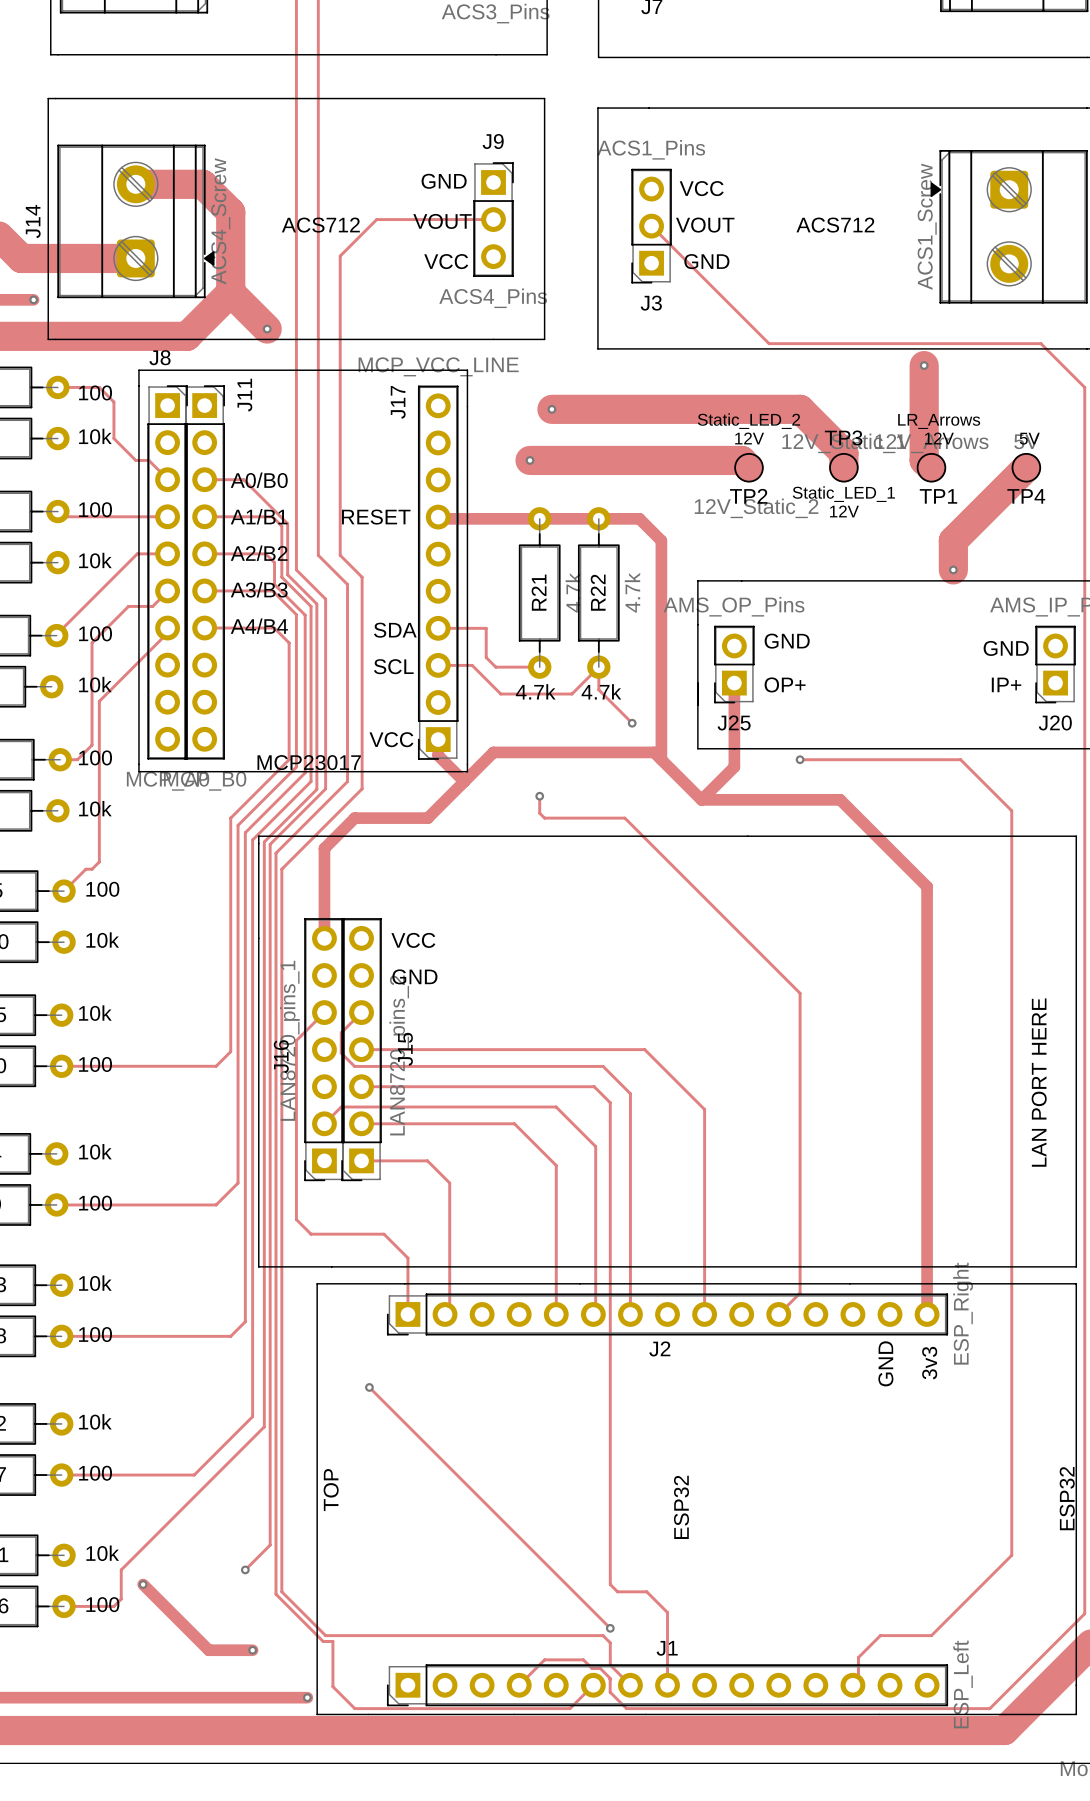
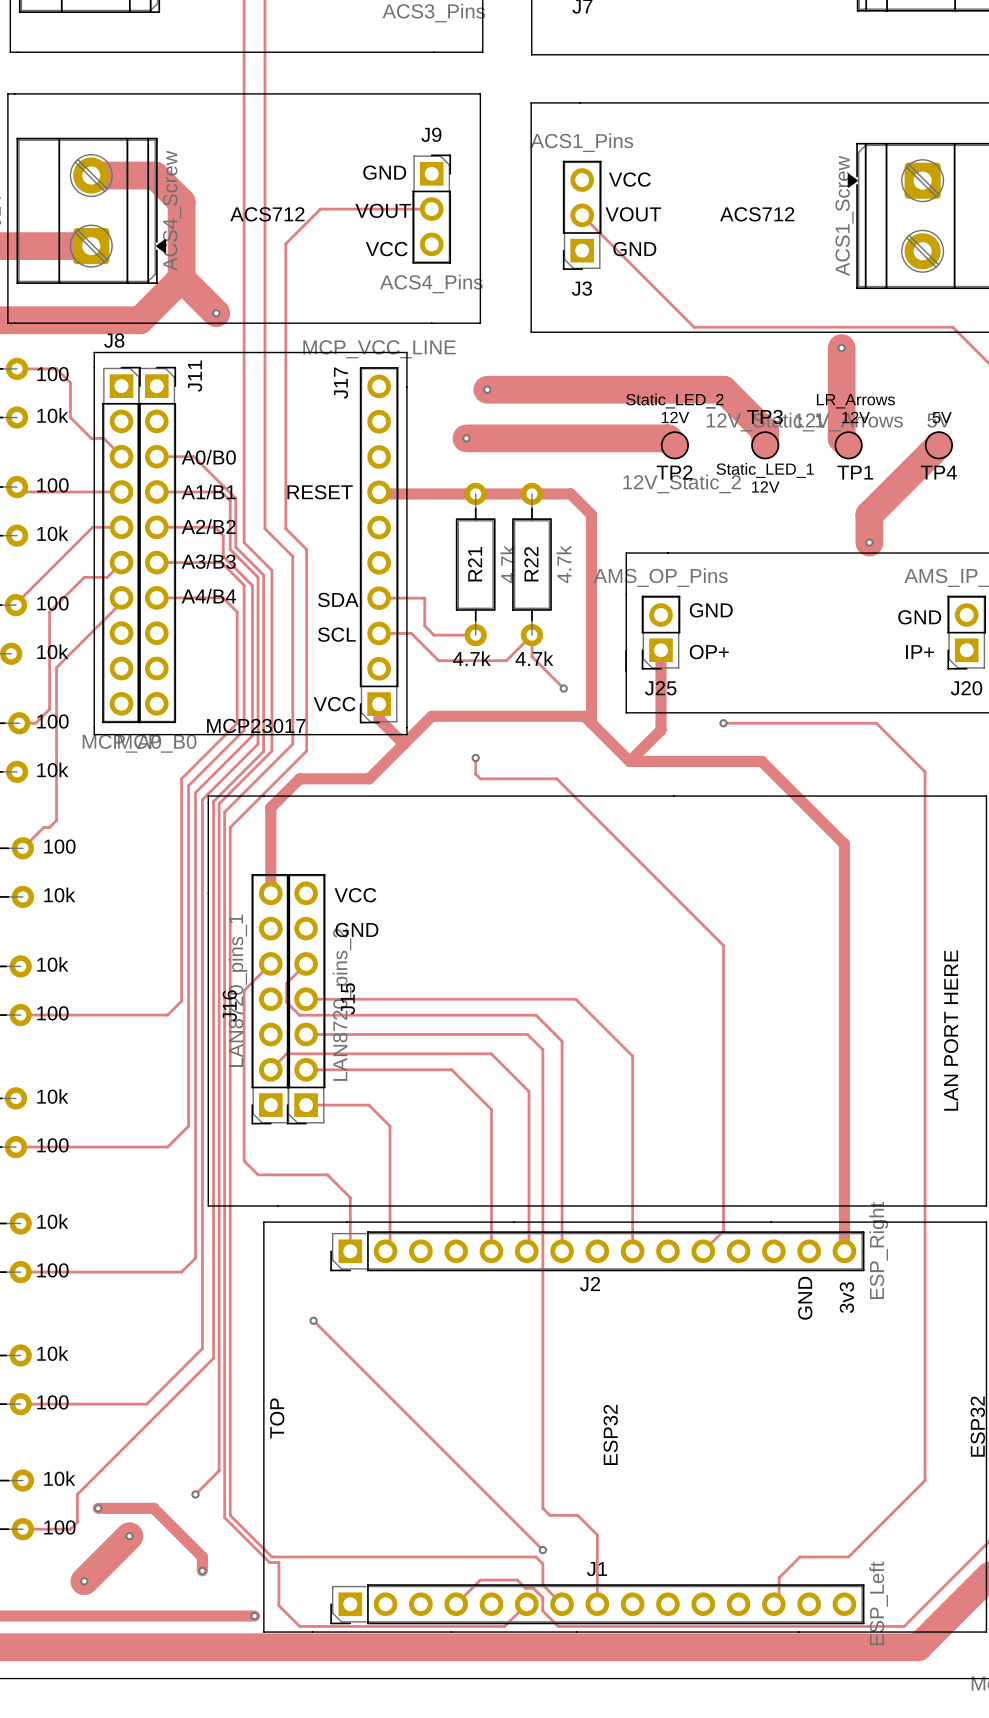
track: (143, 1584) (208, 1650) (252, 1650) -> (98, 1508) (153, 1508) (202, 1556) (202, 1570)
track: none -> (129, 1536) (84, 1581)
via: none -> (129, 1536)
via: none -> (84, 1581)

